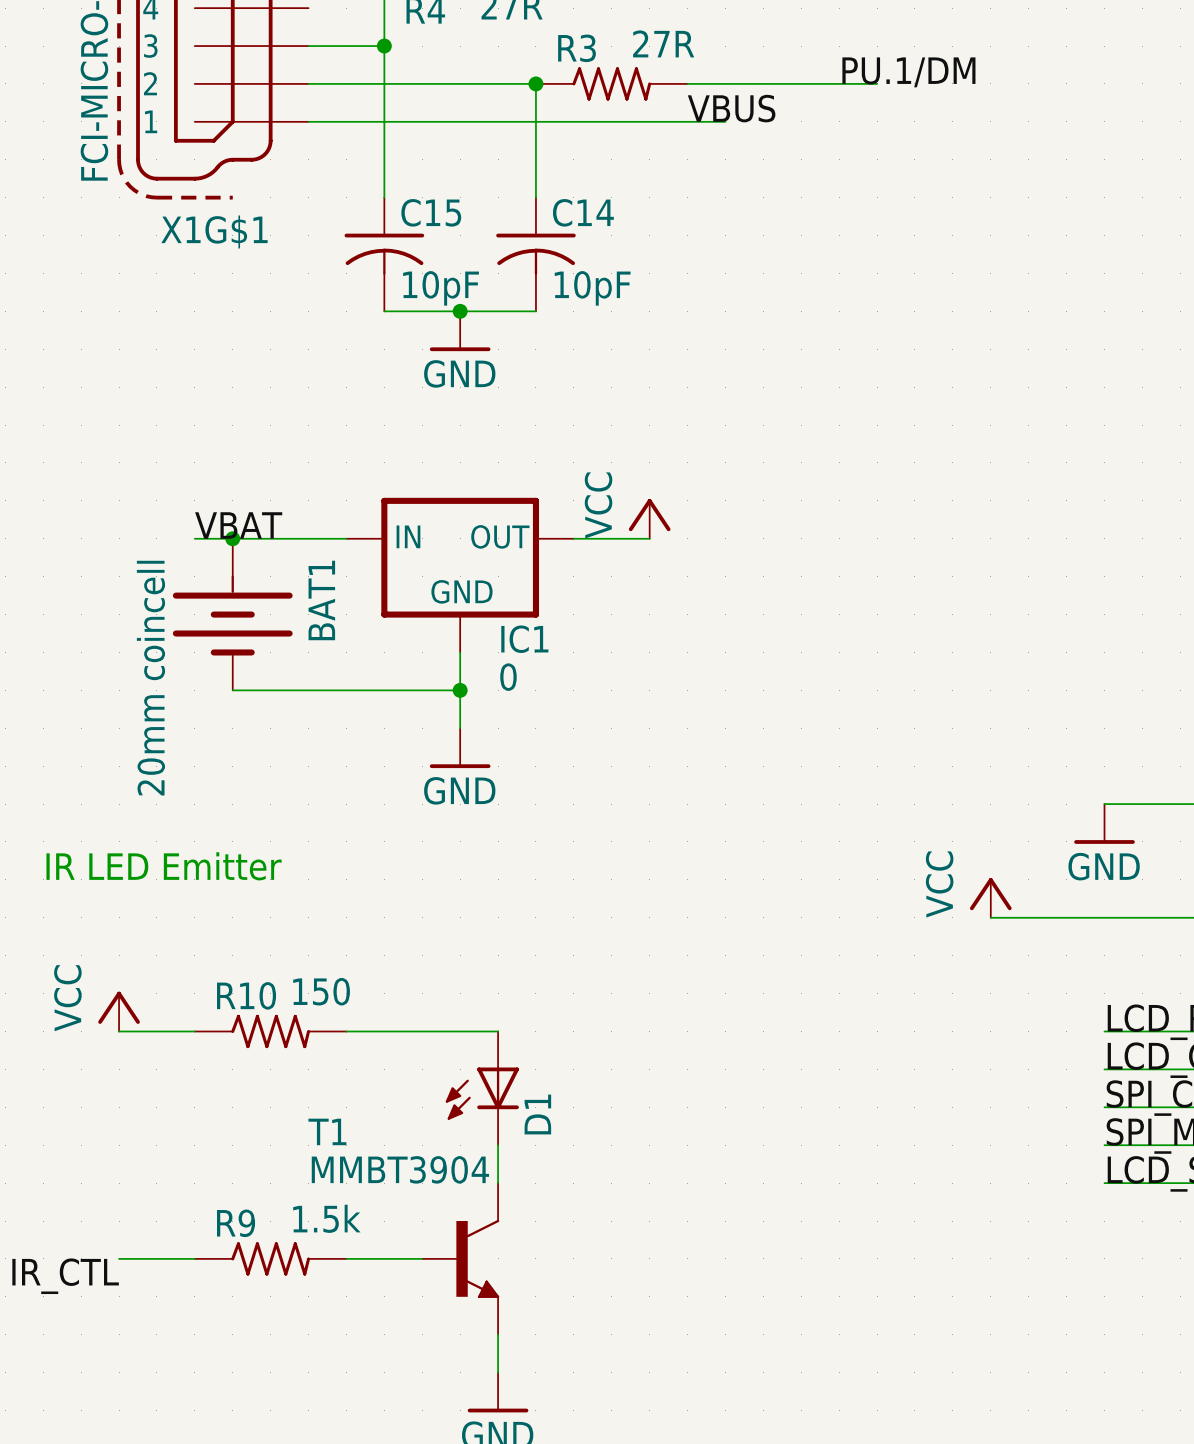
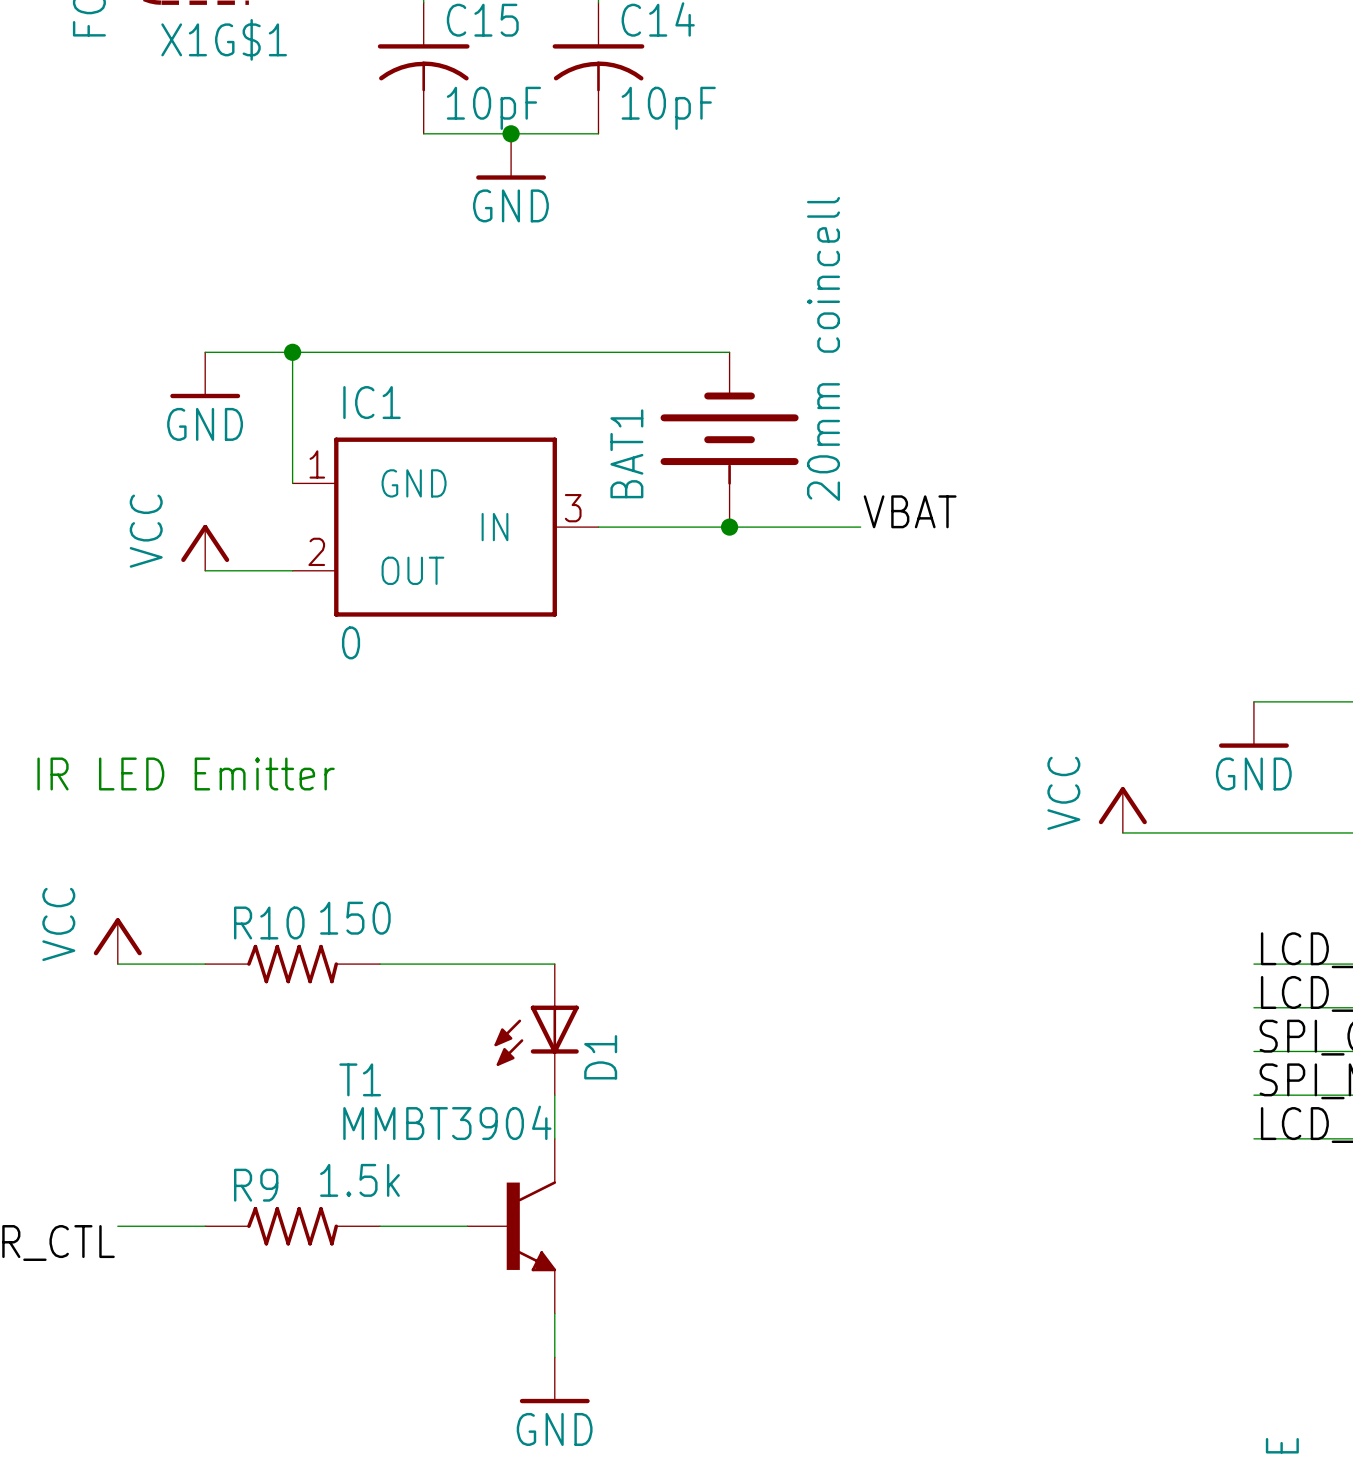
IC1 symbol: [346, 497, 574, 653] -> [292, 437, 599, 617]
wire: none -> (205, 352) (729, 352)
wire: none -> (292, 352) (292, 483)
power symbol: VCC (649, 518) -> none
label: VBAT (238, 525) -> none
wire: (194, 538) (346, 538) -> none
junction position: (232, 538) -> (292, 352)
wire: (573, 538) (649, 538) -> none
BAT1 position: (232, 614) -> (729, 439)
BAT1 rotation: 0° (232, 615) -> 180° (729, 438)
IC1 name position: IC1 (524, 639) -> IC1 (371, 402)
label: none -> VBAT (910, 511)
wire: (460, 652) (460, 728) -> none
wire: none -> (598, 527) (860, 527)
junction: none -> (729, 527)
power symbol: none -> VCC (205, 547)
IC1 value position: 0 (508, 677) -> 0 (351, 642)
wire: none -> (205, 570) (248, 570)
wire: (270, 690) (460, 690) -> none
junction: (460, 690) -> none
power symbol position: GND (460, 748) -> GND (205, 375)

